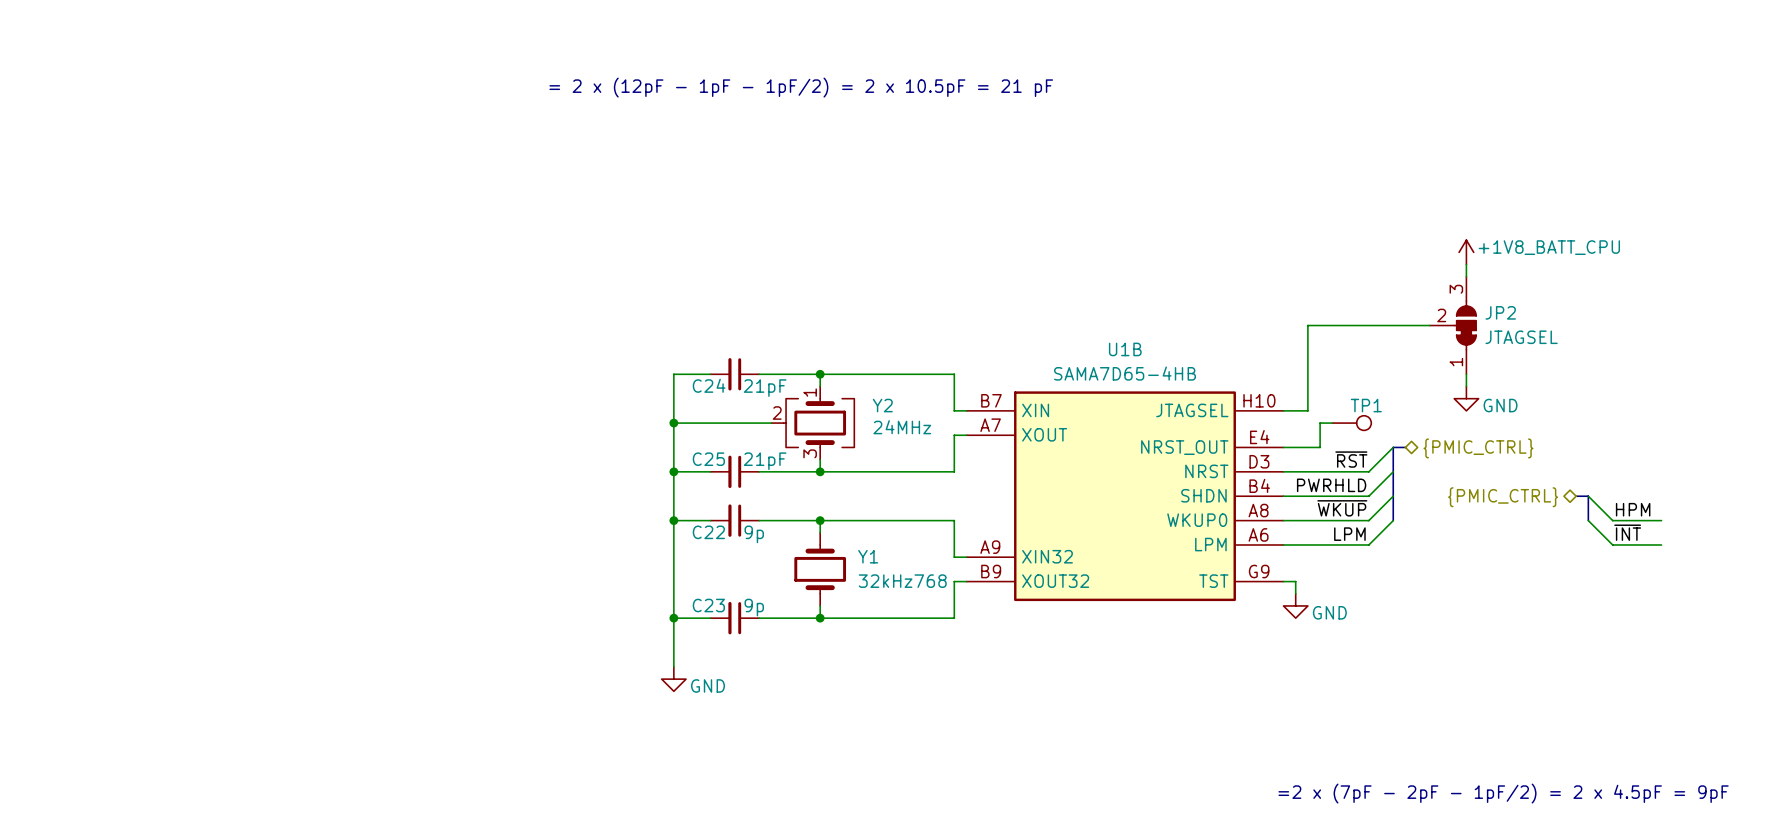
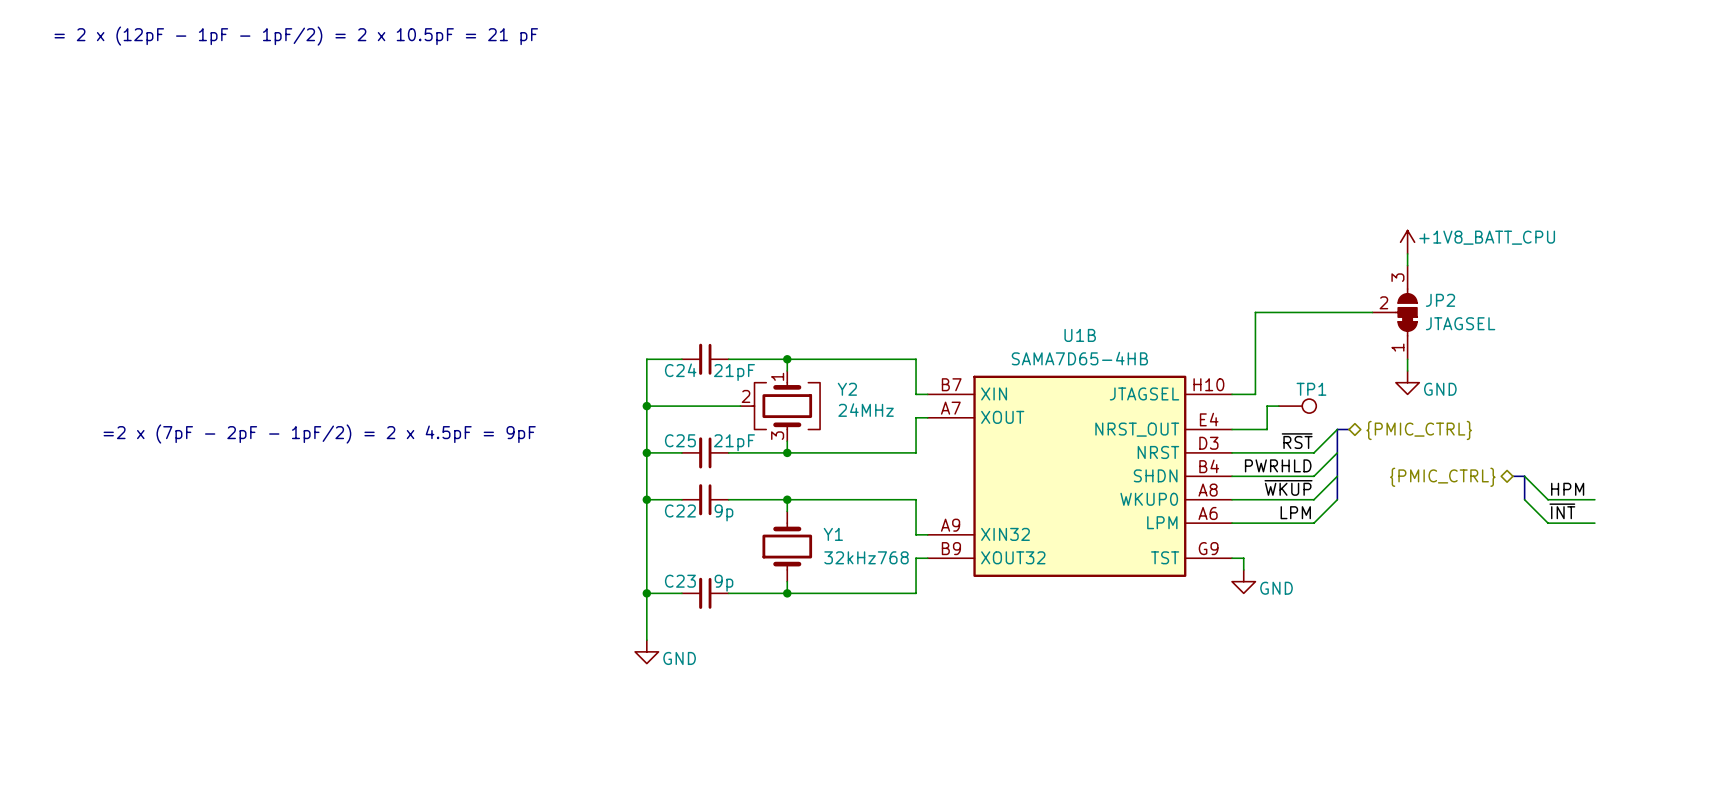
text: none -> = 2 x (12pF - 1pF - 1pF/2) = 2 x 10.5pF = 21 pF (296, 36)
text: = 2 x (12pF - 1pF - 1pF/2) = 2 x 10.5pF = 21 pF (801, 87) -> none
text: none -> =2 x (7pF - 2pF - 1pF/2) = 2 x 4.5pF = 9pF (319, 434)
text: =2 x (7pF - 2pF - 1pF/2) = 2 x 4.5pF = 9pF (1503, 793) -> none

